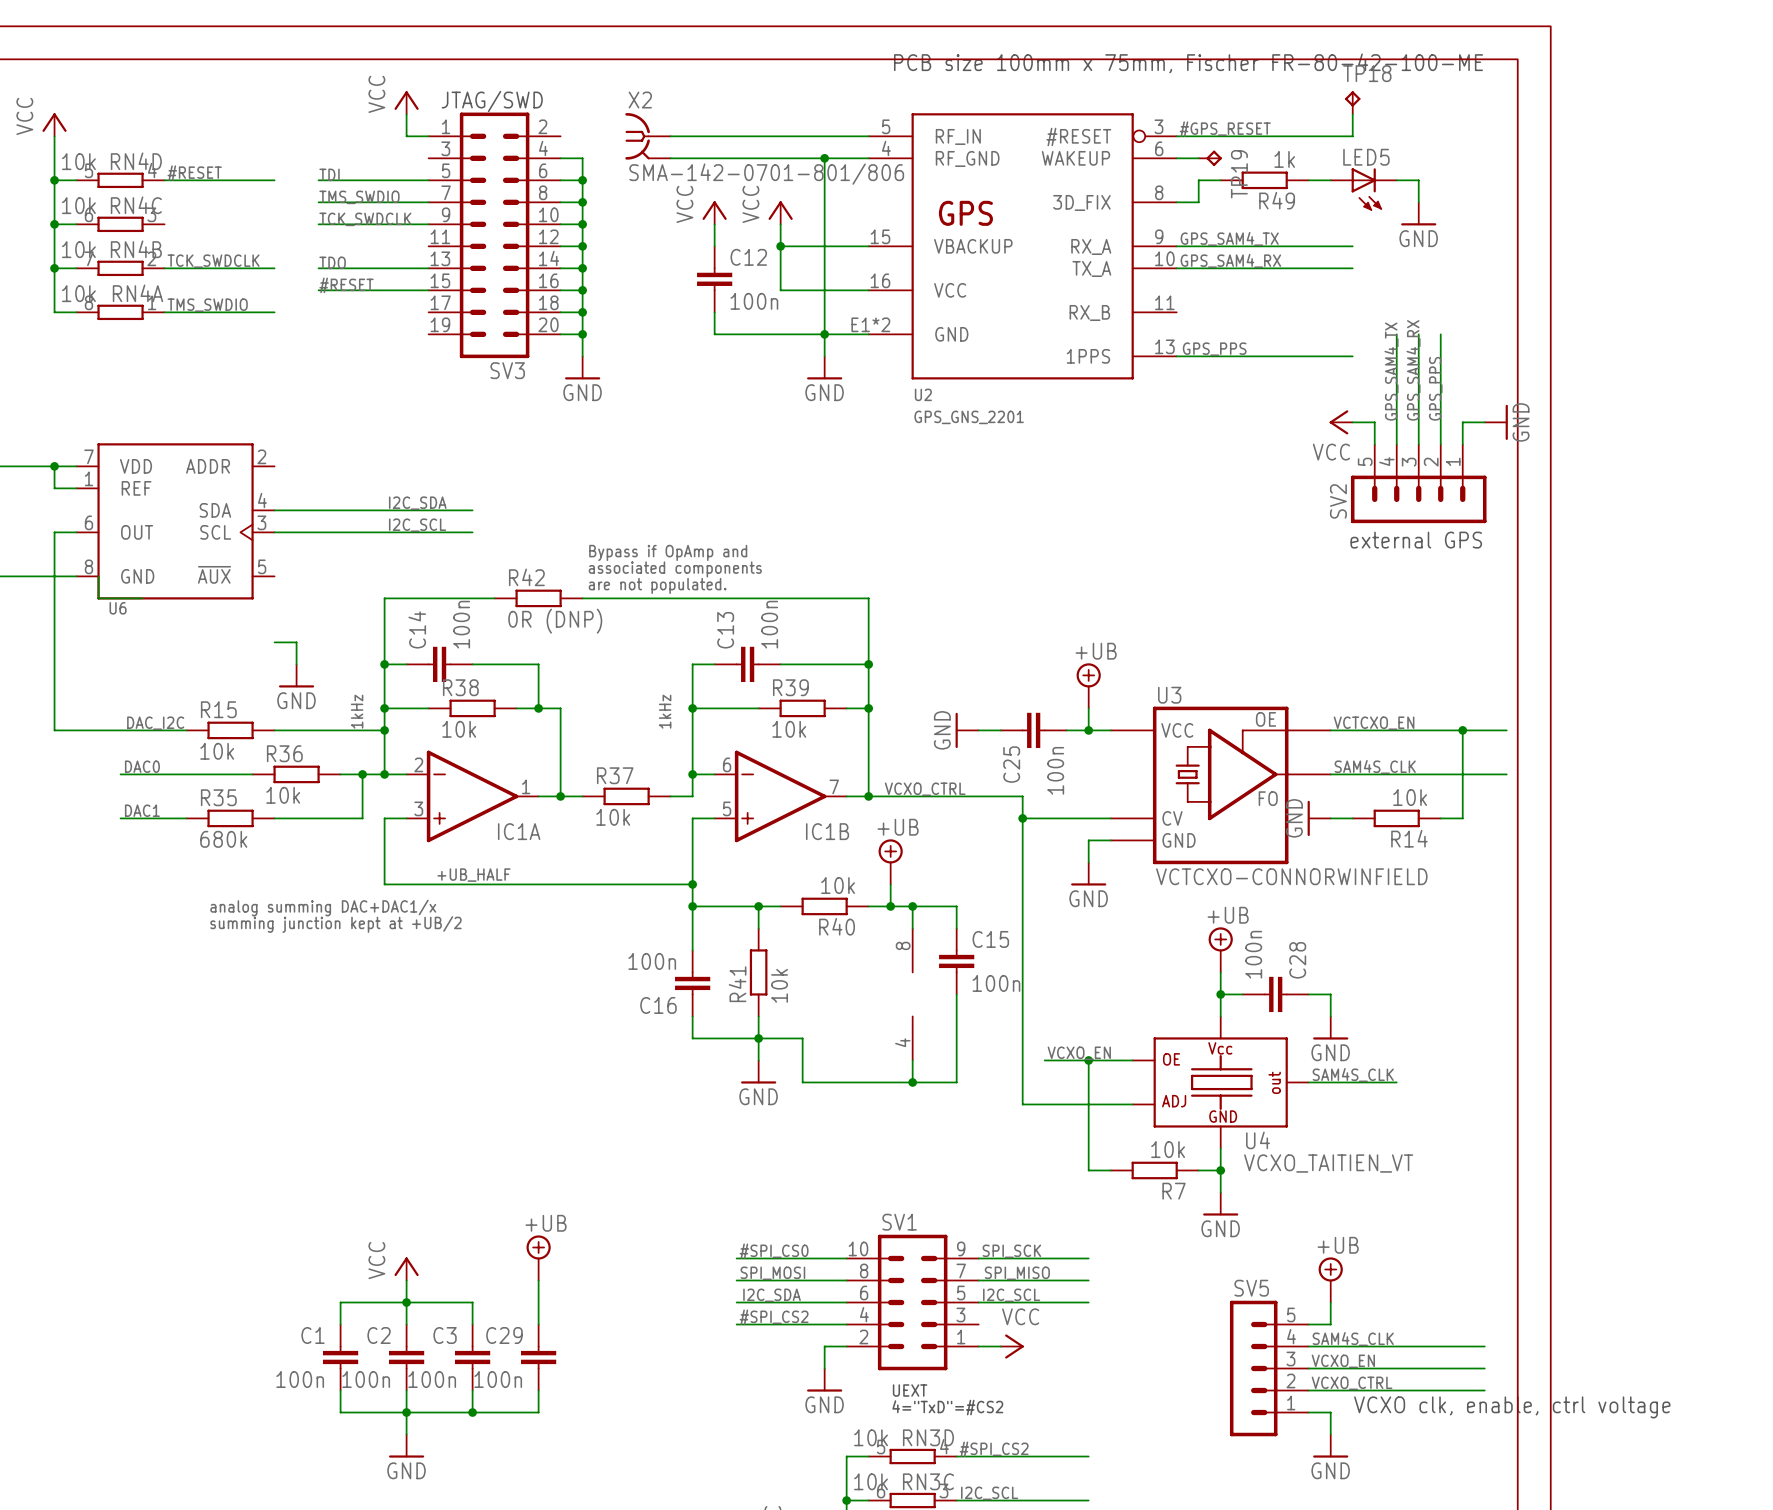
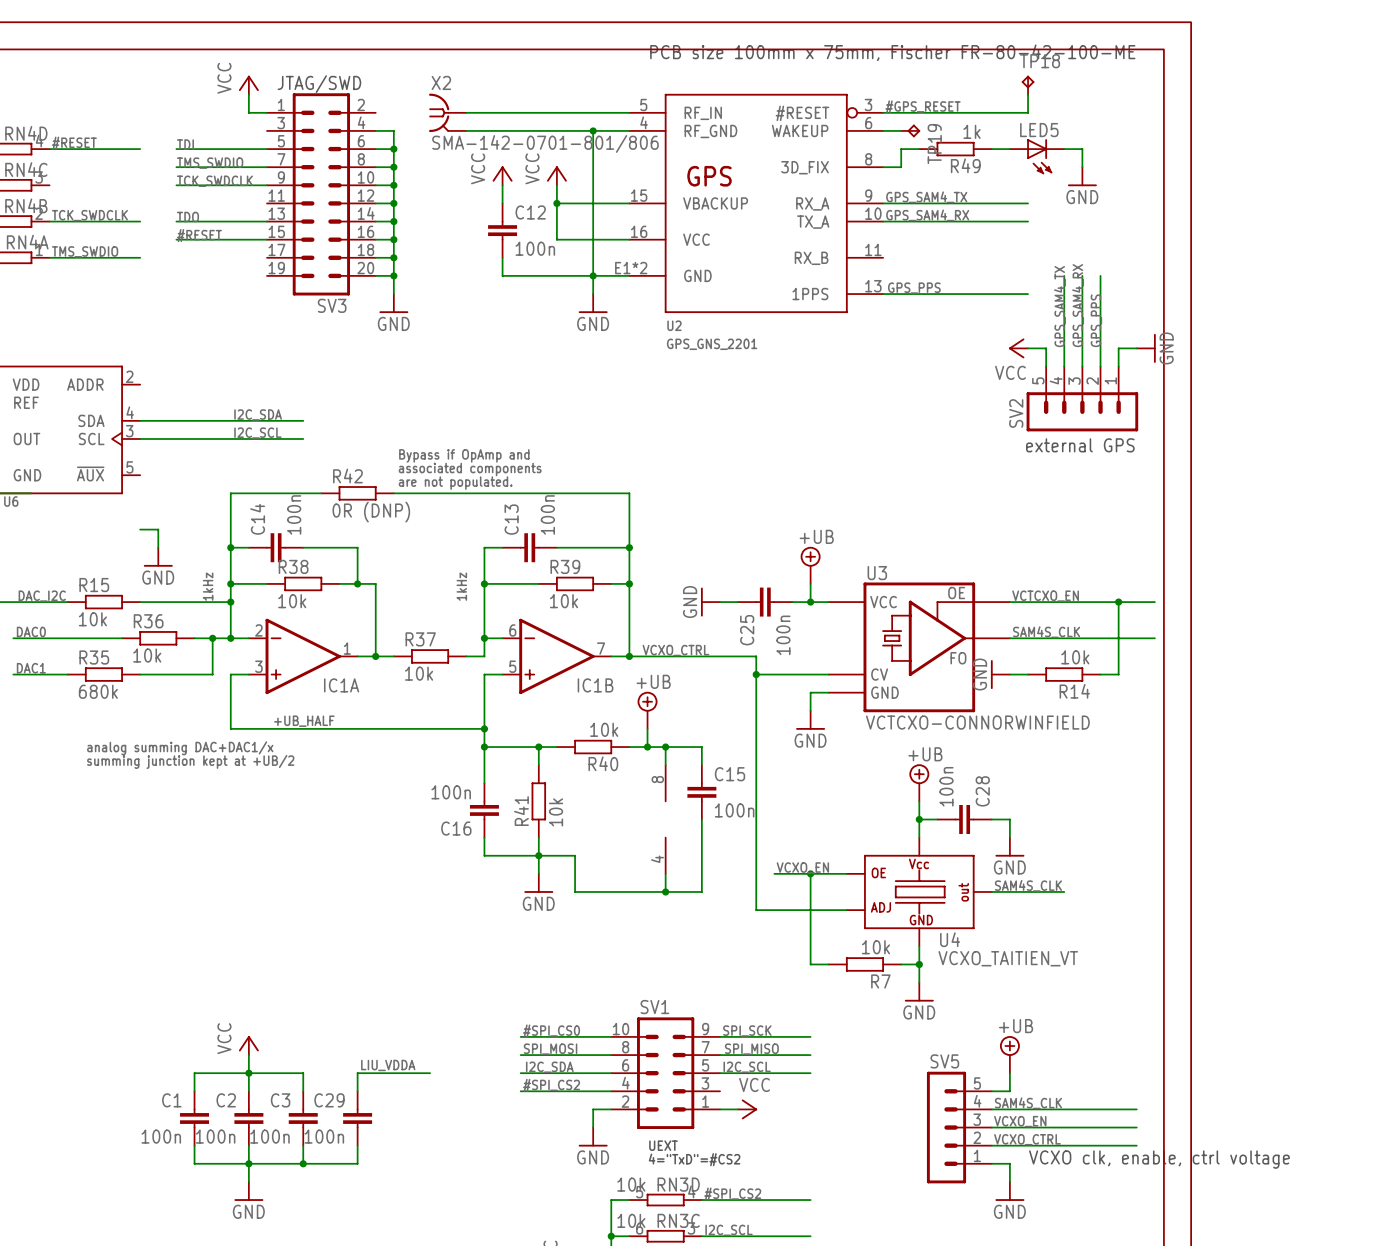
power symbol: +UB (538, 1257) -> none
wire: (538, 1280) (538, 1302) -> (430, 1073) (357, 1073)
label: none -> LIU_VDDA (388, 1065)

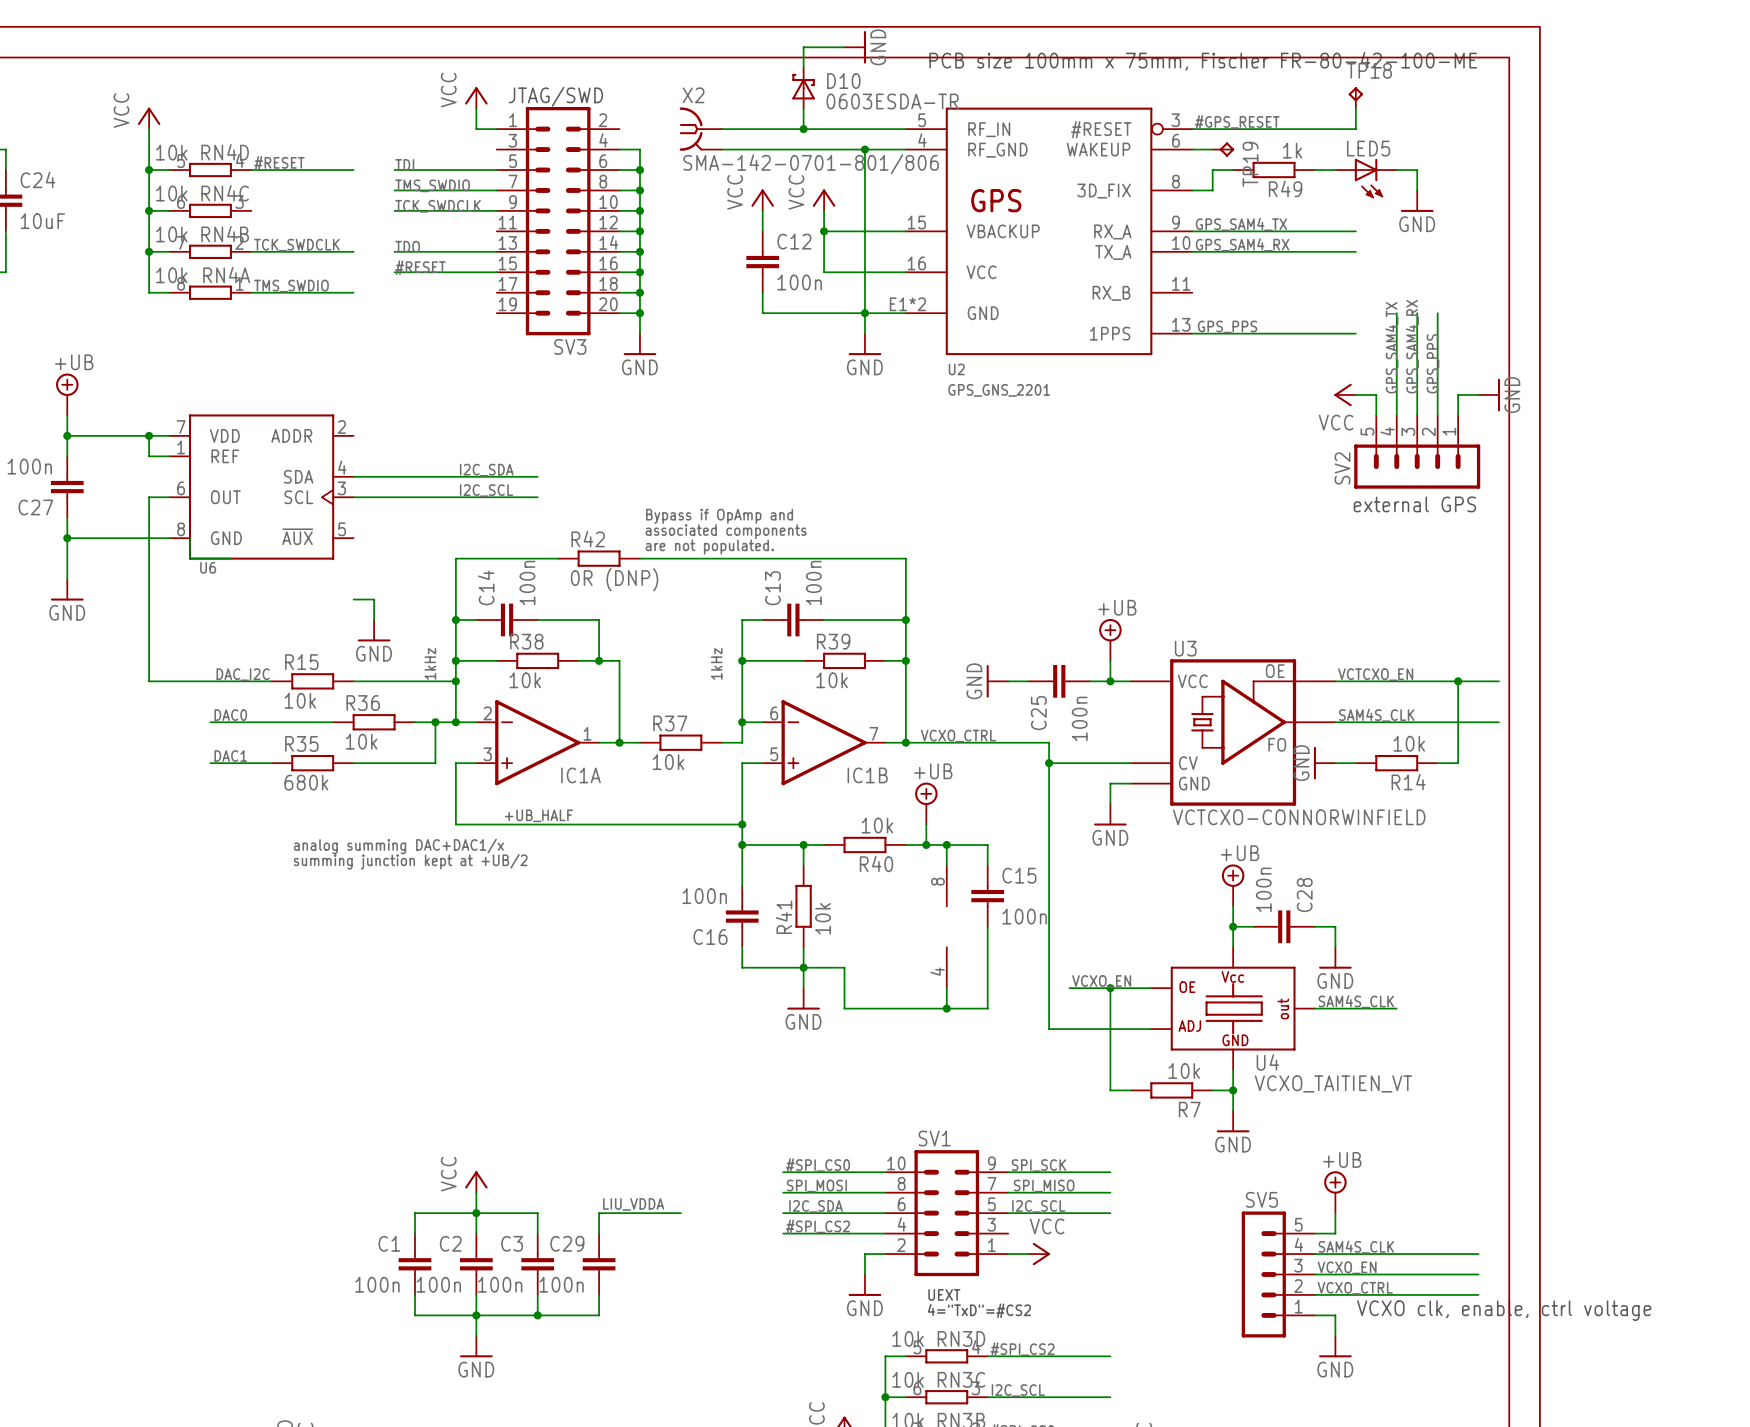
wire: none -> (844, 47) (803, 47) (803, 67)
power symbol: none -> GND (855, 47)
D10: none -> 0603ESDA-TR (803, 88)
wire: none -> (803, 108) (803, 129)
junction: none -> (803, 129)

